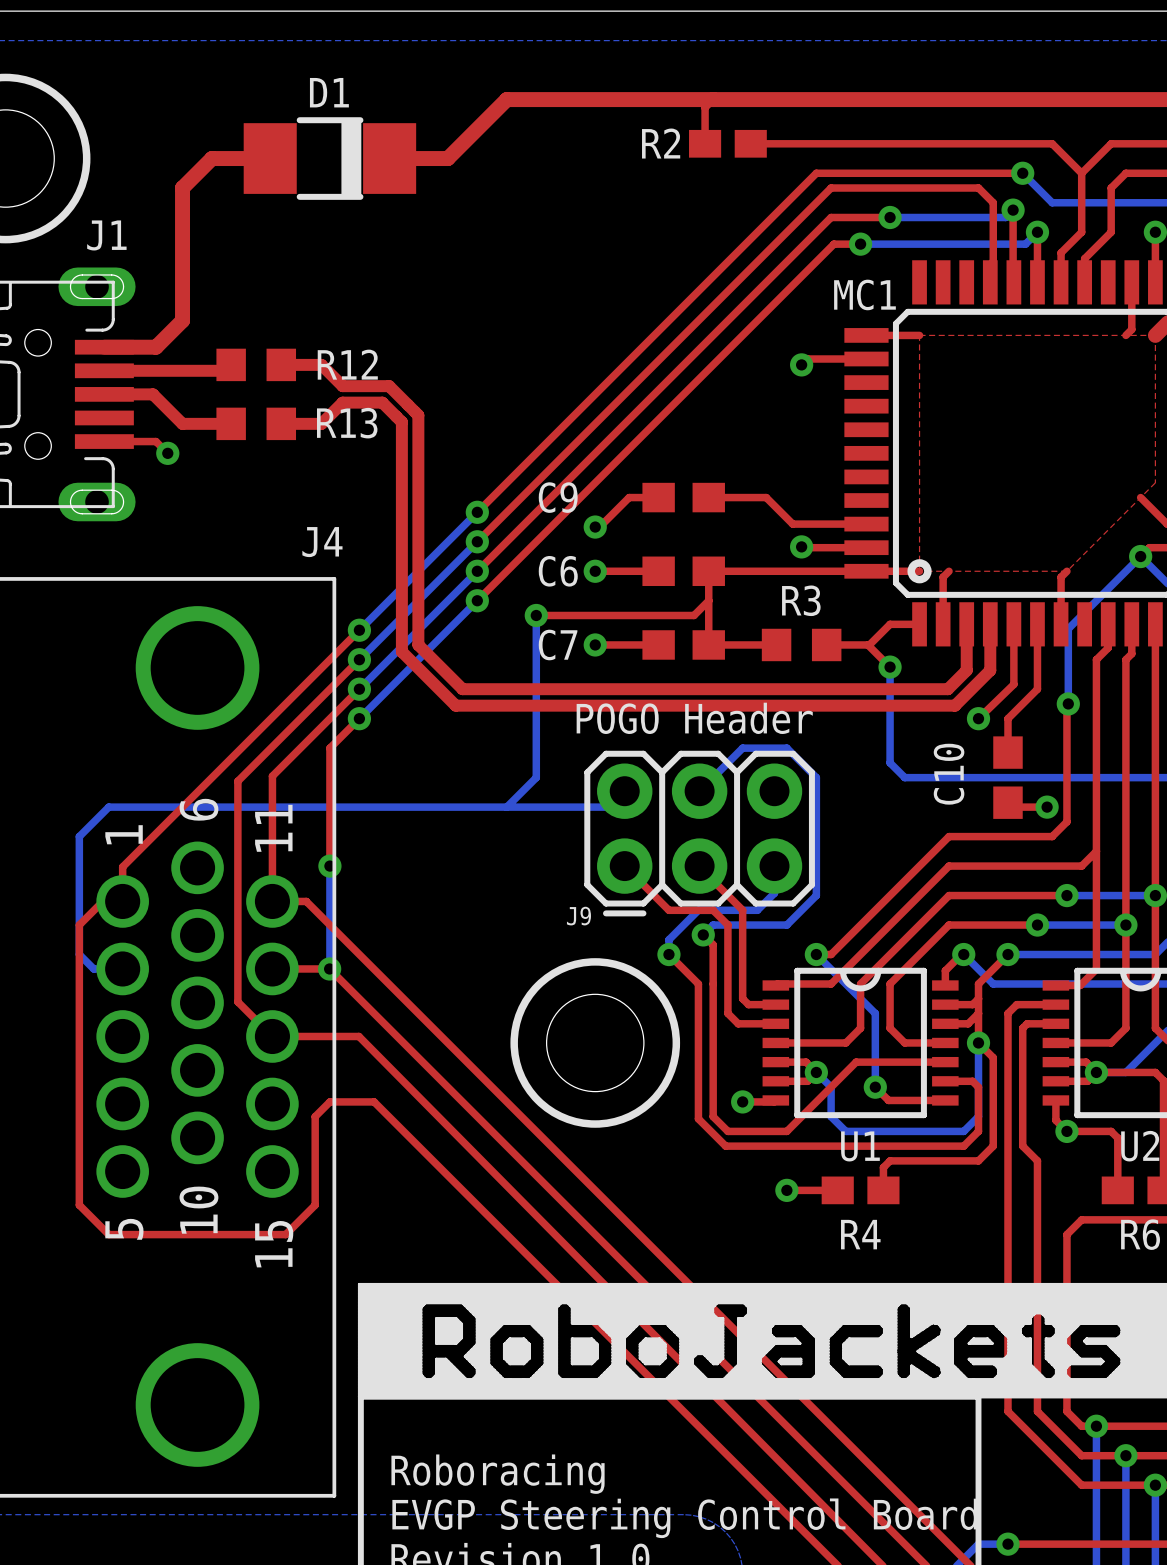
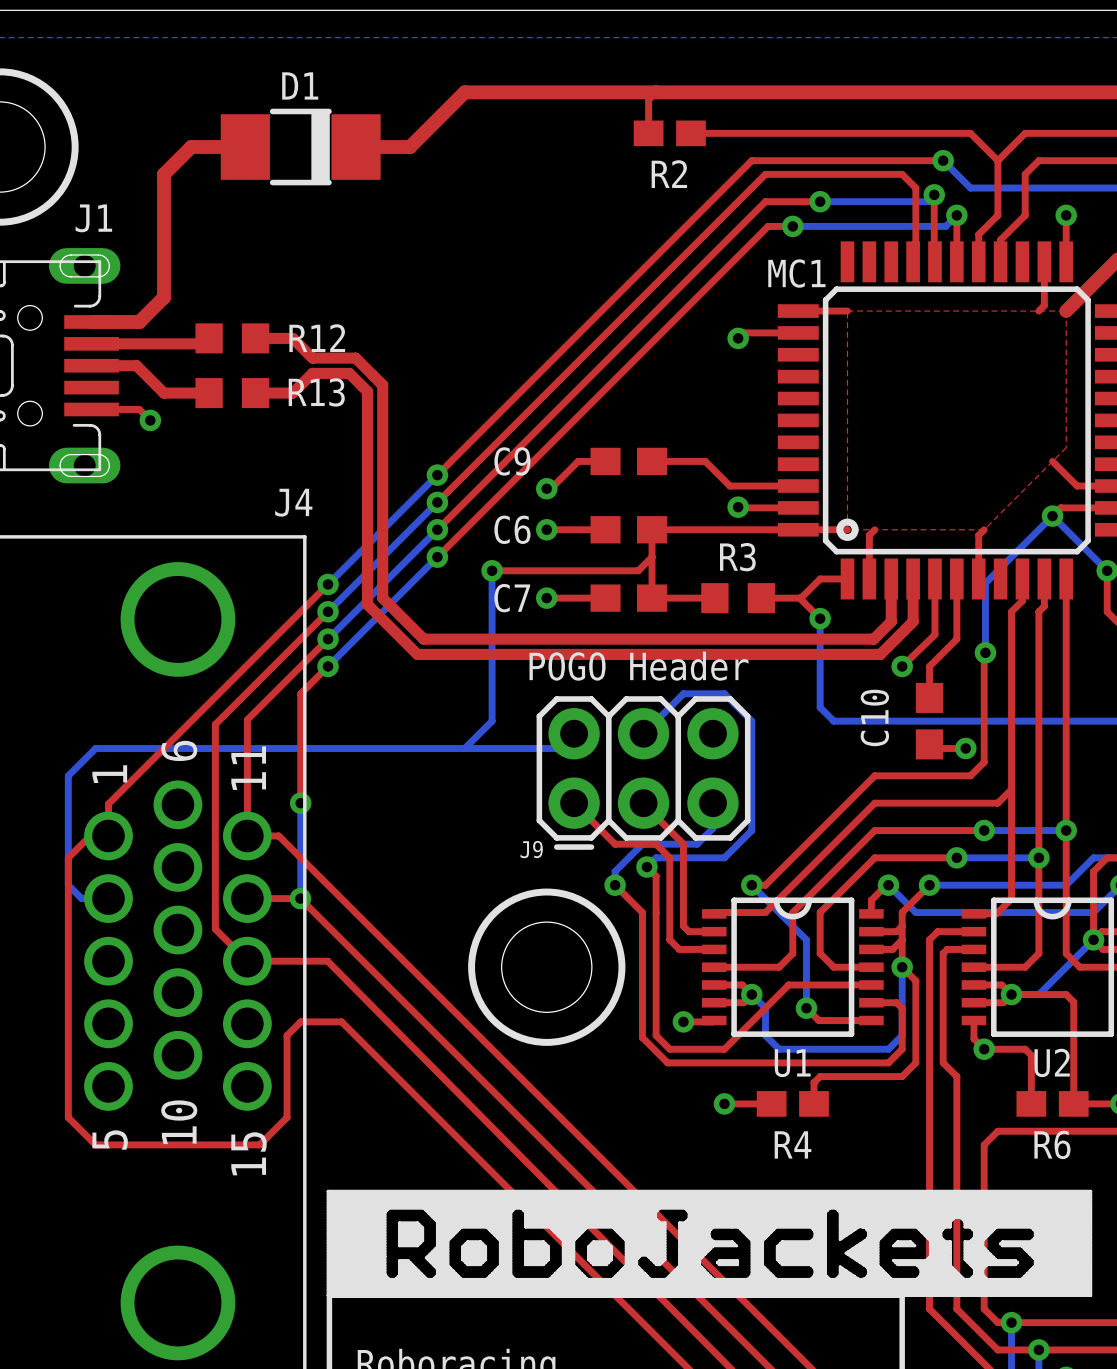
R2 name position: R2 (661, 143) -> R2 (669, 174)

